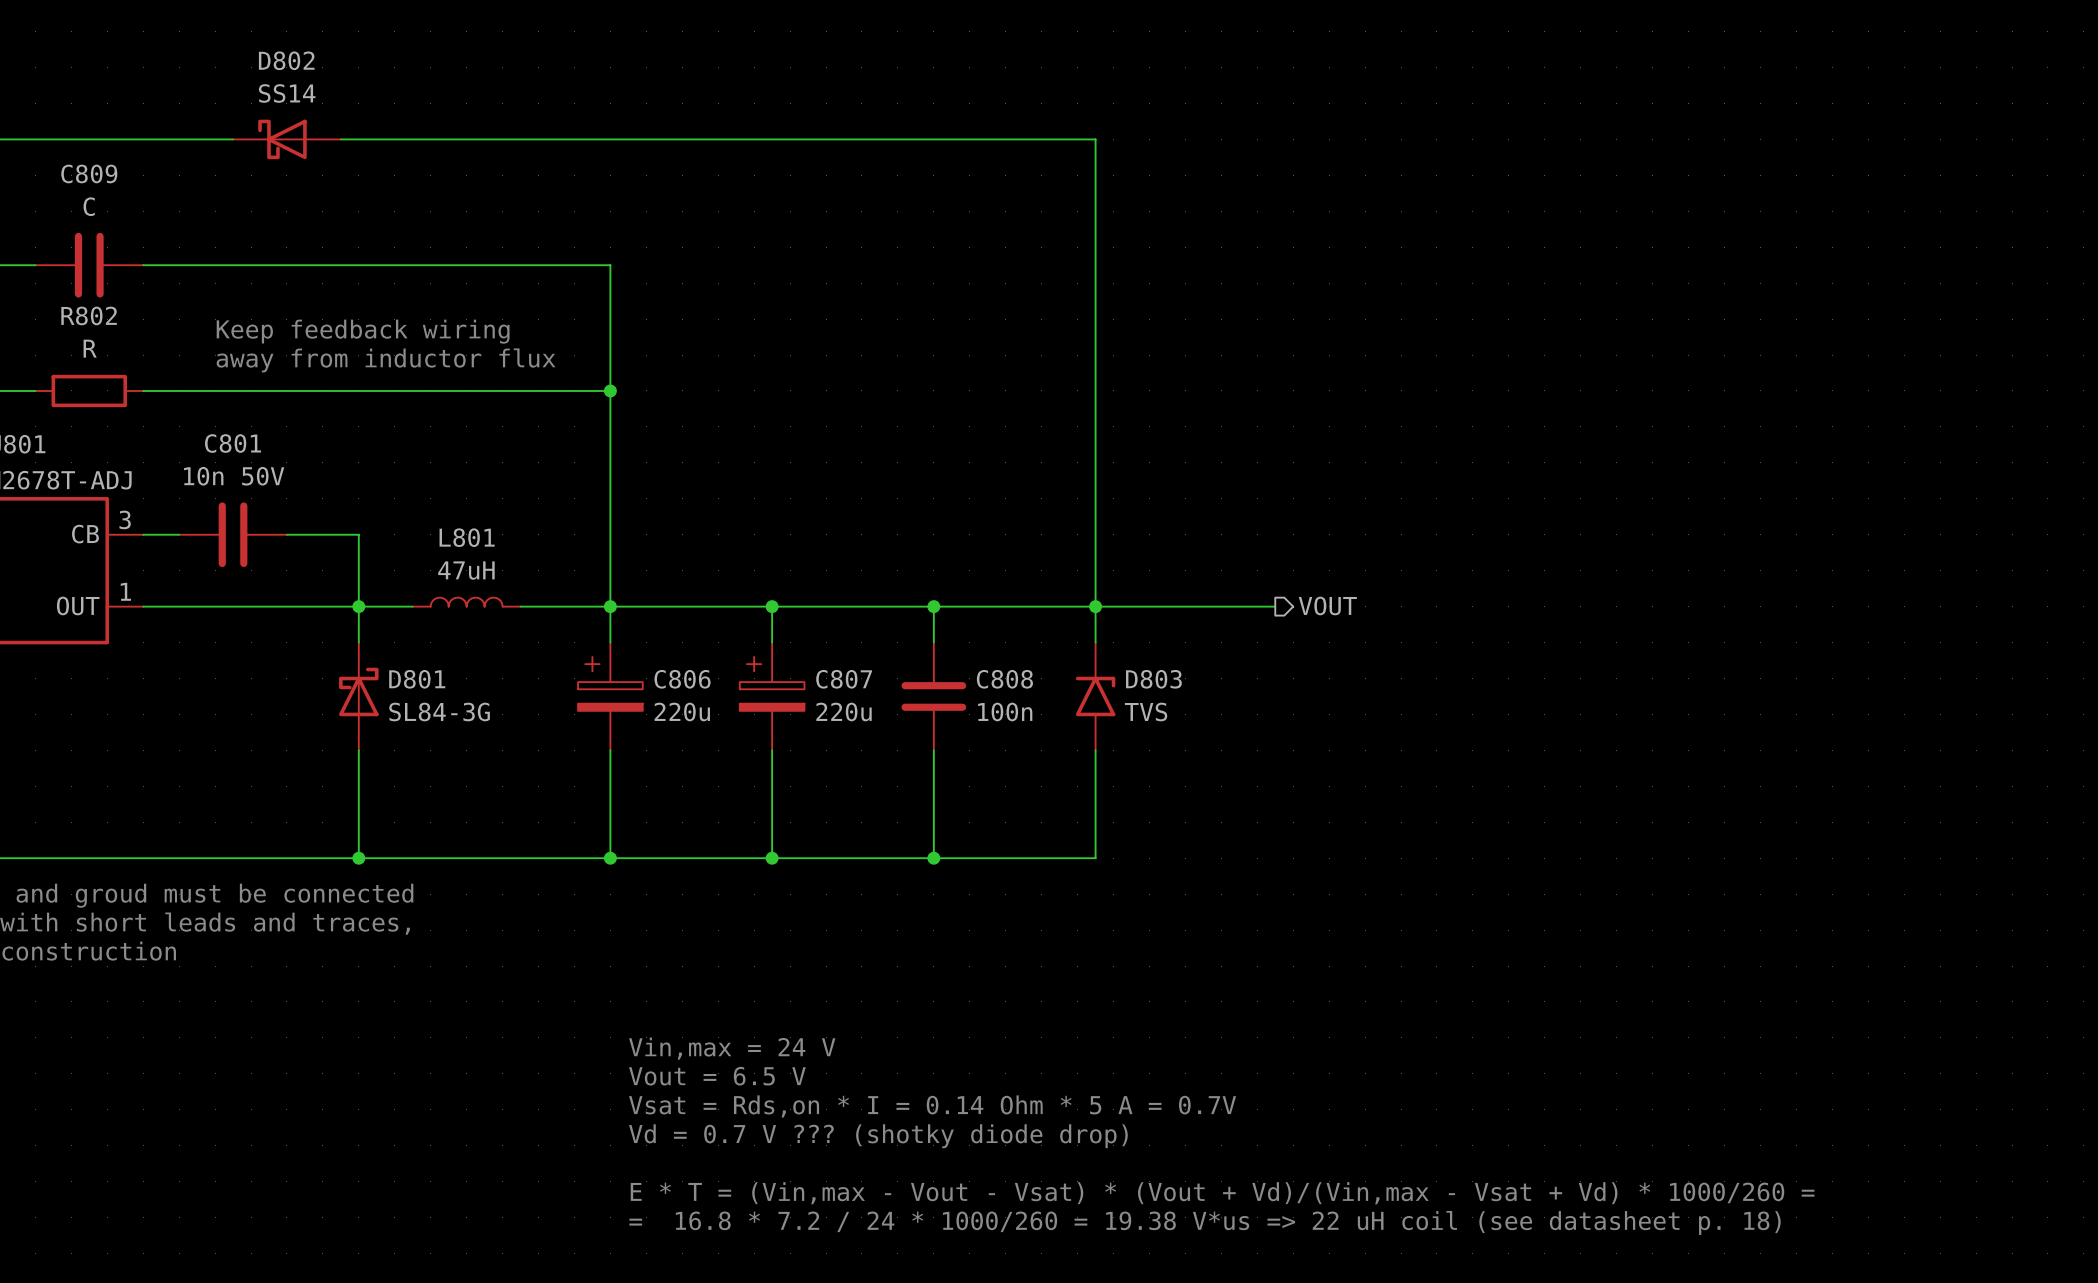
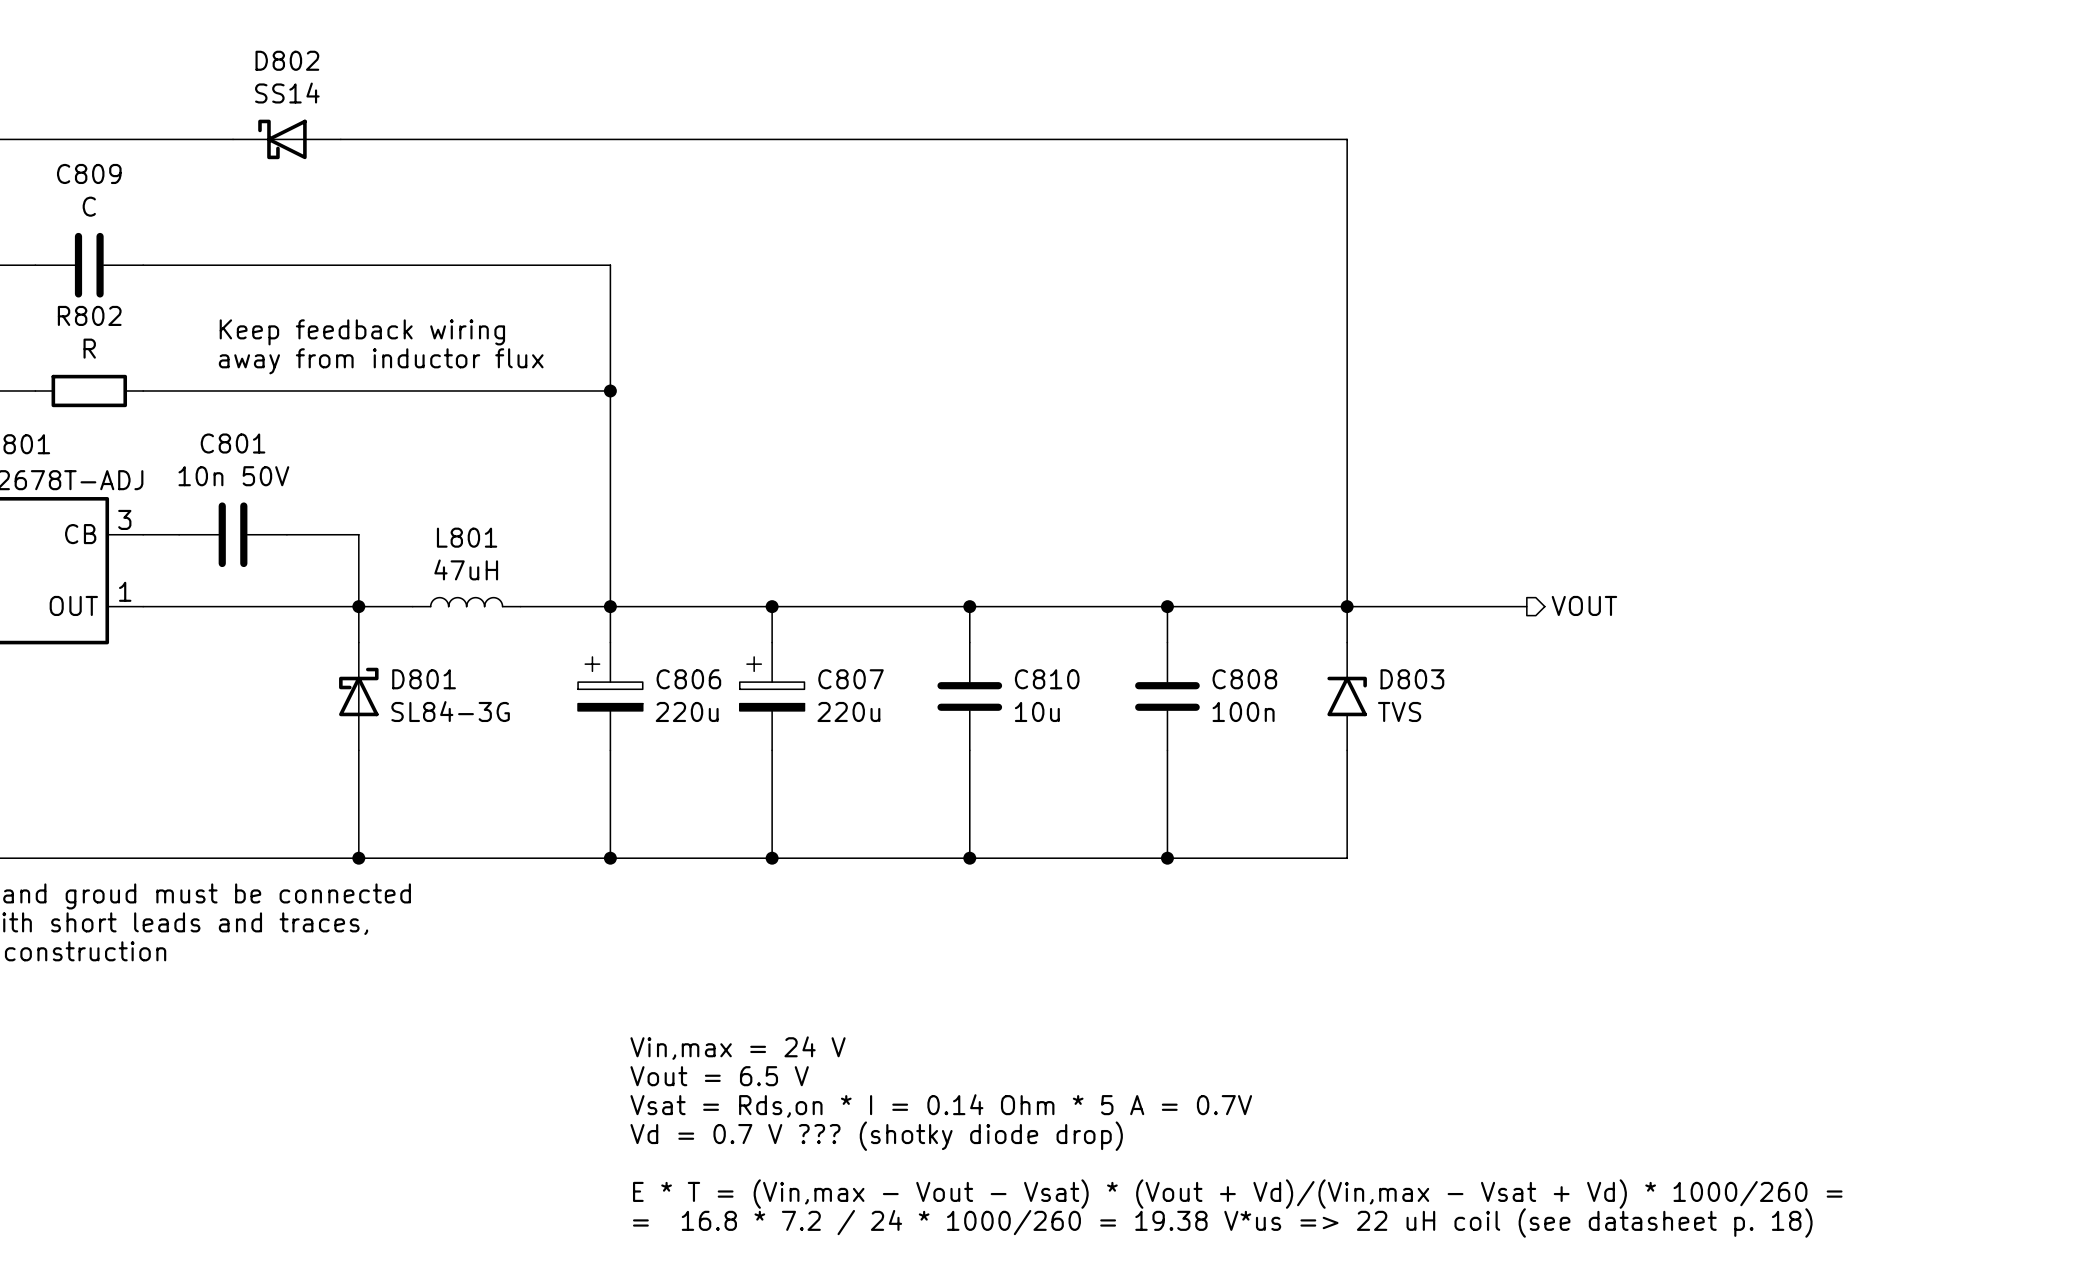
wire: (1095, 139) (1095, 642) -> (1095, 139) (1347, 139) (1347, 642)
hierarchical label position: VOUT (1327, 605) -> VOUT (1584, 605)
wire: (933, 606) (933, 642) -> (969, 606) (969, 642)
junction position: (933, 606) -> (969, 606)
junction: (1095, 606) -> none
wire: none -> (1167, 606) (1167, 642)
junction: none -> (1167, 606)
wire: none -> (1275, 606) (1526, 606)
junction: none -> (1347, 606)
C808 position: (933, 696) -> (1167, 696)
C810: none -> 10u (969, 696)
D803 position: (1095, 696) -> (1347, 696)
wire: (933, 750) (933, 858) -> (969, 750) (969, 858)
wire: (1095, 750) (1095, 858) -> (1347, 750) (1347, 858) (1095, 858)
wire: none -> (1167, 750) (1167, 858)
junction position: (933, 858) -> (969, 858)
junction: none -> (1167, 858)

